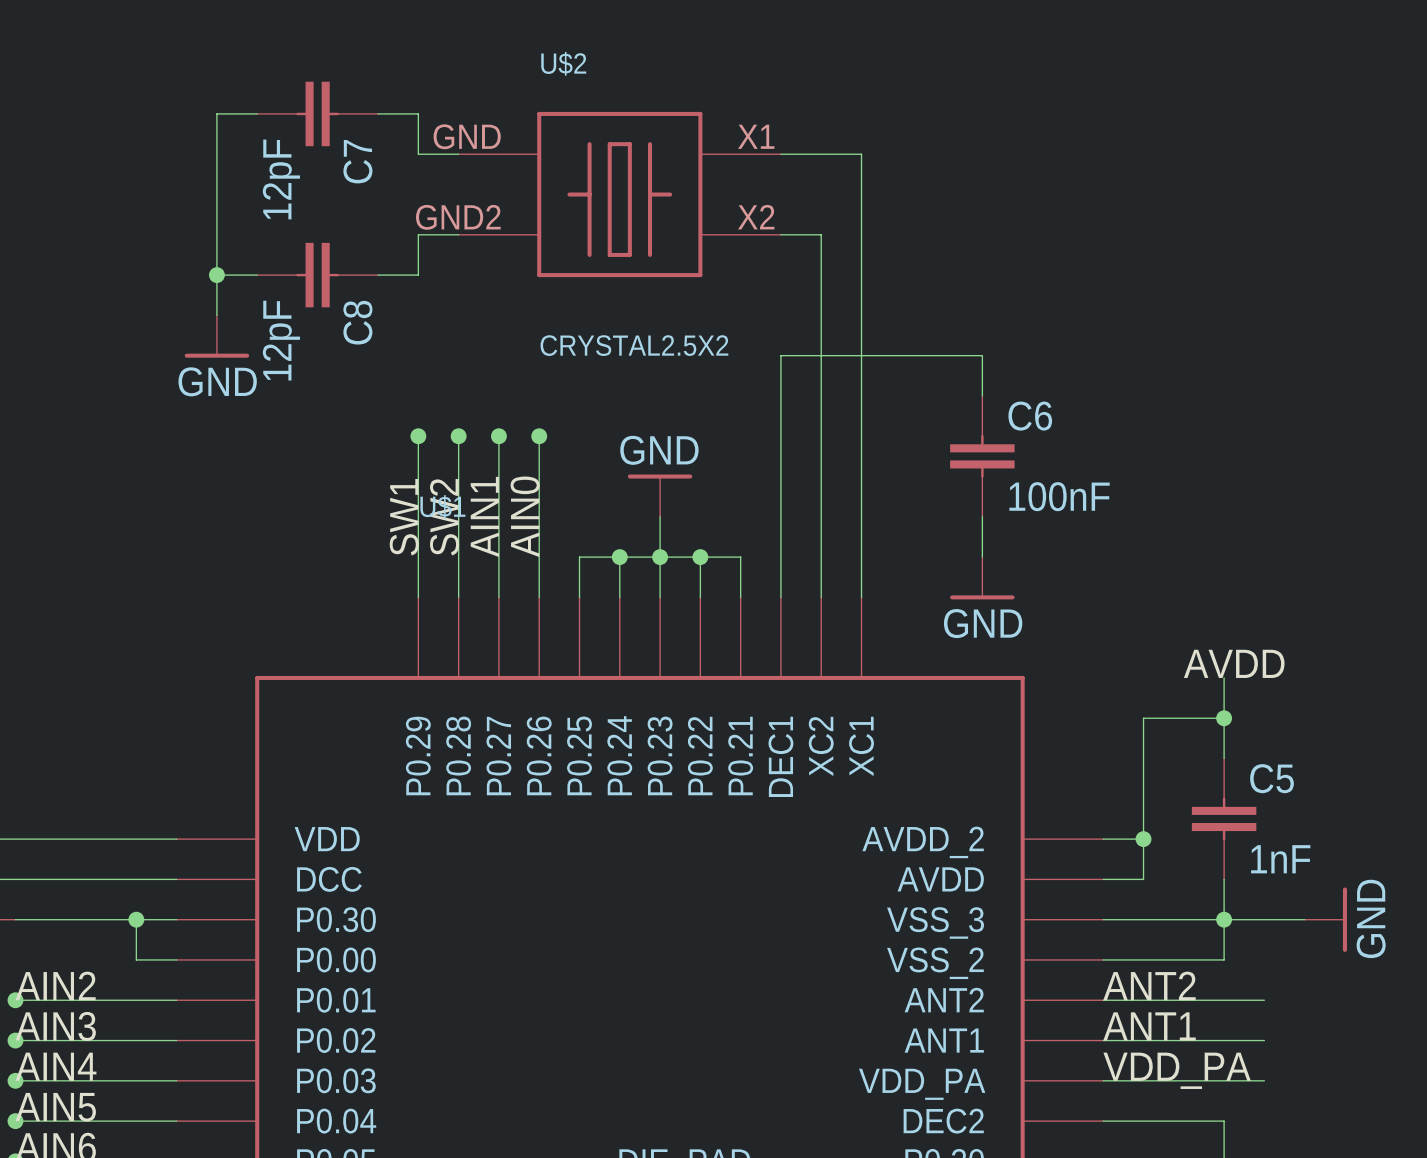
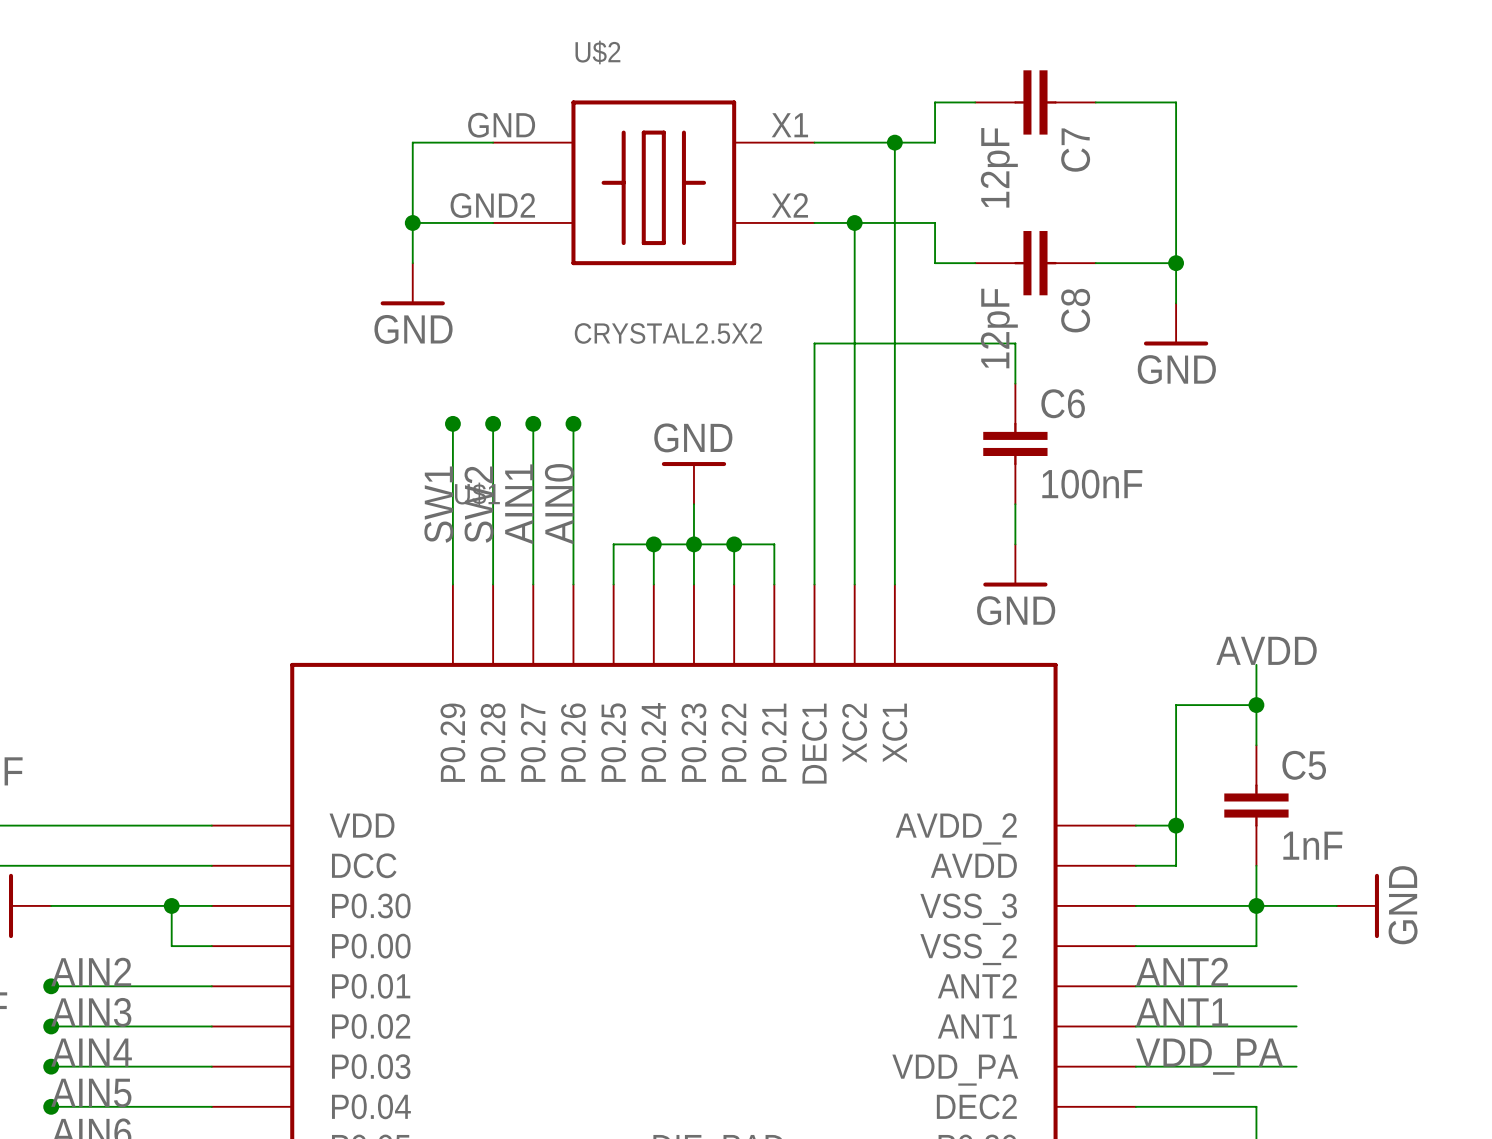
wire: (257, 113) (216, 113) (216, 315) -> none
C7 position: (317, 113) -> (1035, 102)
wire: (378, 113) (418, 113) (418, 154) -> (412, 263) (412, 142) (452, 142)
wire: none -> (975, 102) (935, 102) (935, 142) (894, 142)
wire: none -> (1095, 102) (1176, 102) (1176, 303)
junction: none -> (894, 142)
junction: none -> (412, 222)
wire: (418, 234) (418, 275) (378, 275) -> (452, 222) (412, 222)
wire: none -> (854, 222) (935, 222) (935, 263) (975, 263)
junction: none -> (854, 222)
wire: (216, 275) (257, 275) -> none
junction: (216, 275) -> none
C8 position: (317, 275) -> (1035, 263)
wire: none -> (1095, 263) (1176, 263)
junction: none -> (1176, 263)
power symbol position: GND (216, 336) -> GND (412, 284)
power symbol: none -> GND (1176, 324)

